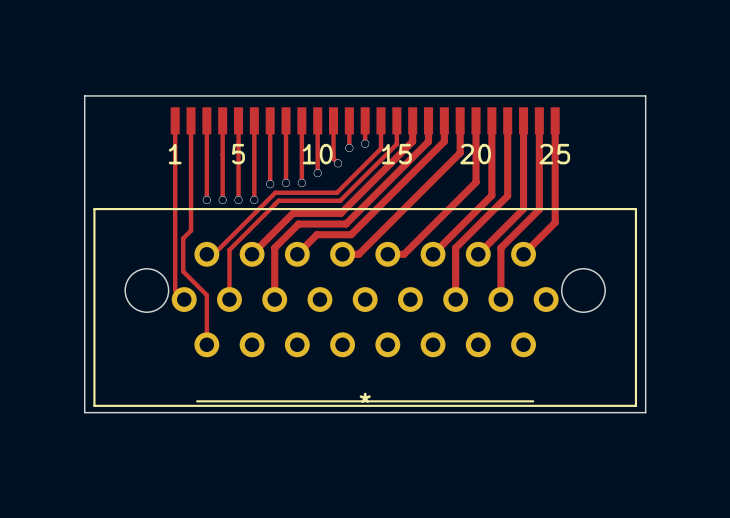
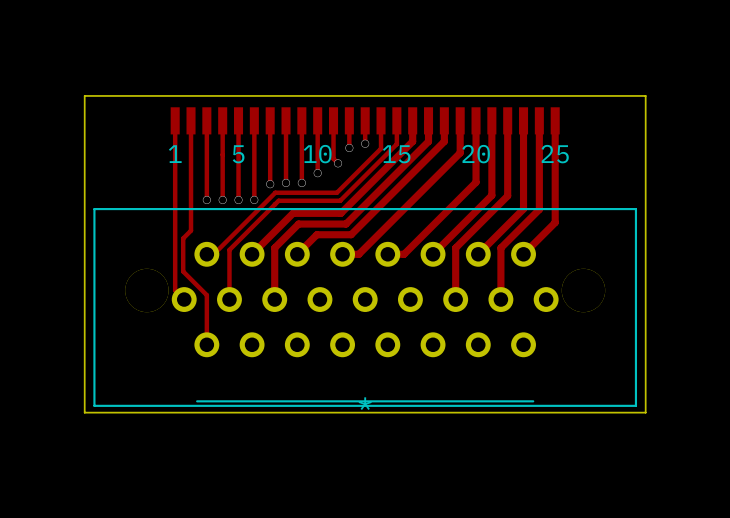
part footprint: [93, 207, 638, 407] -> [93, 207, 638, 407]

